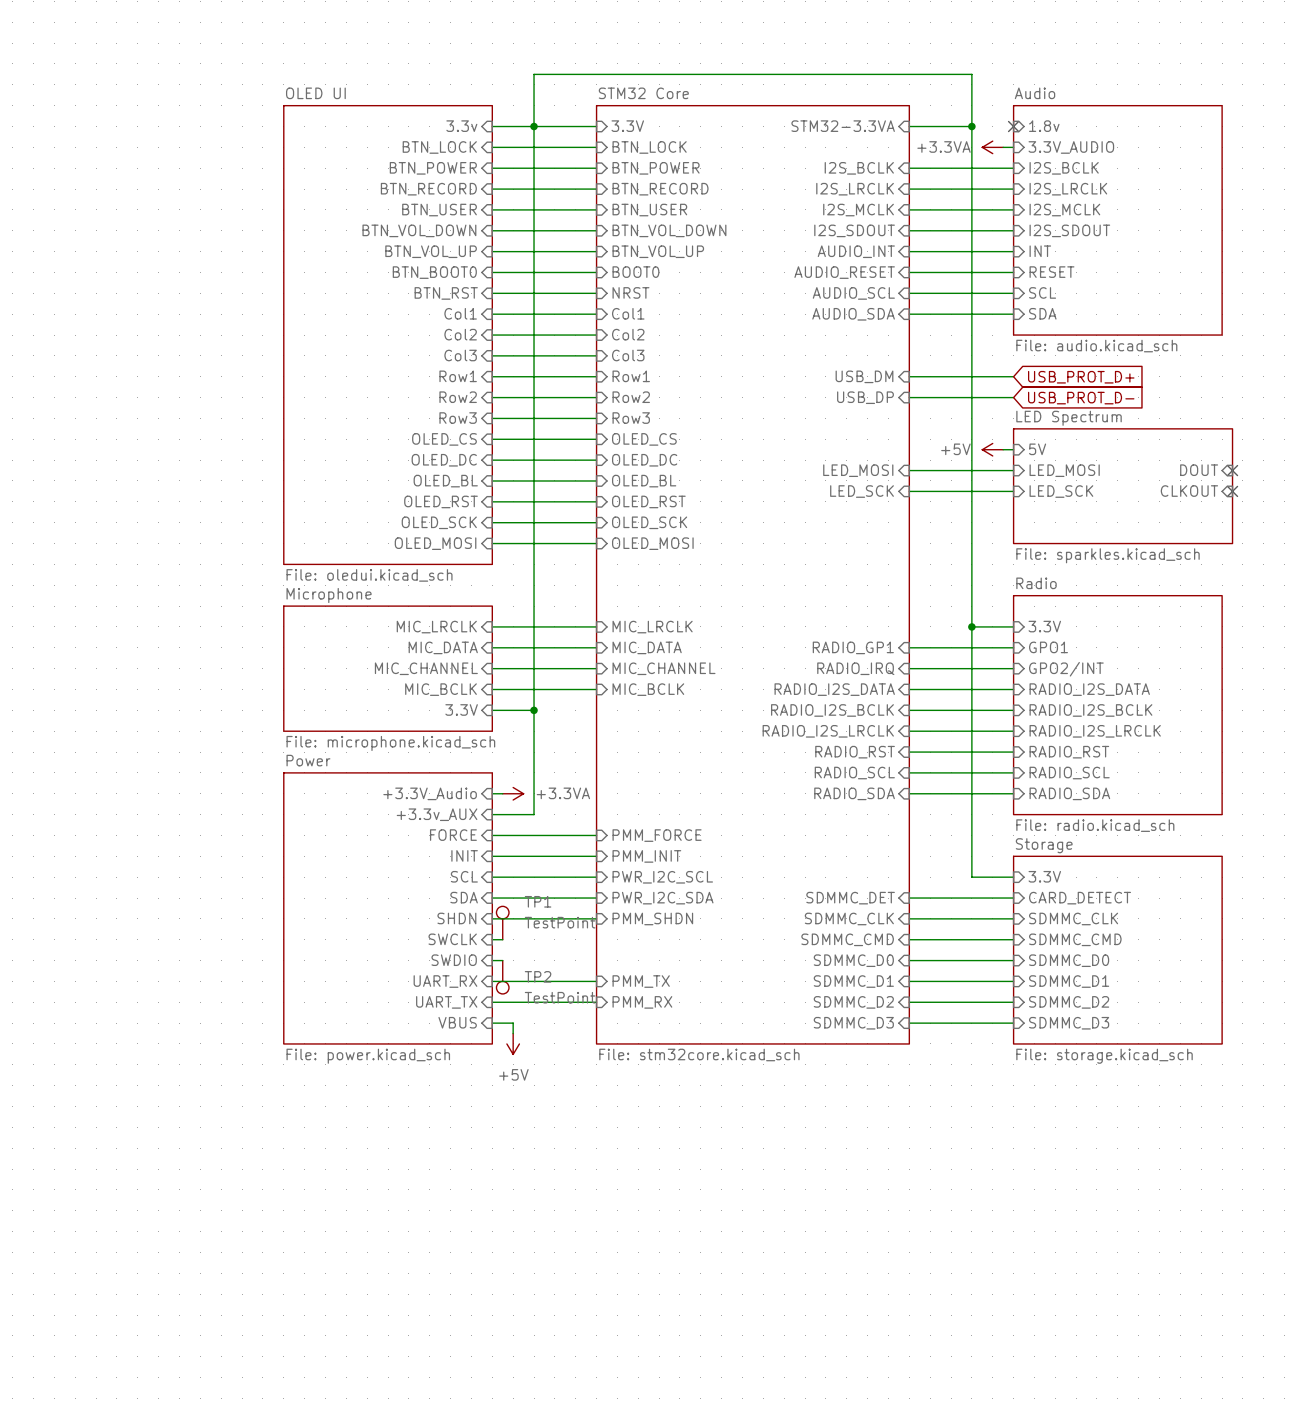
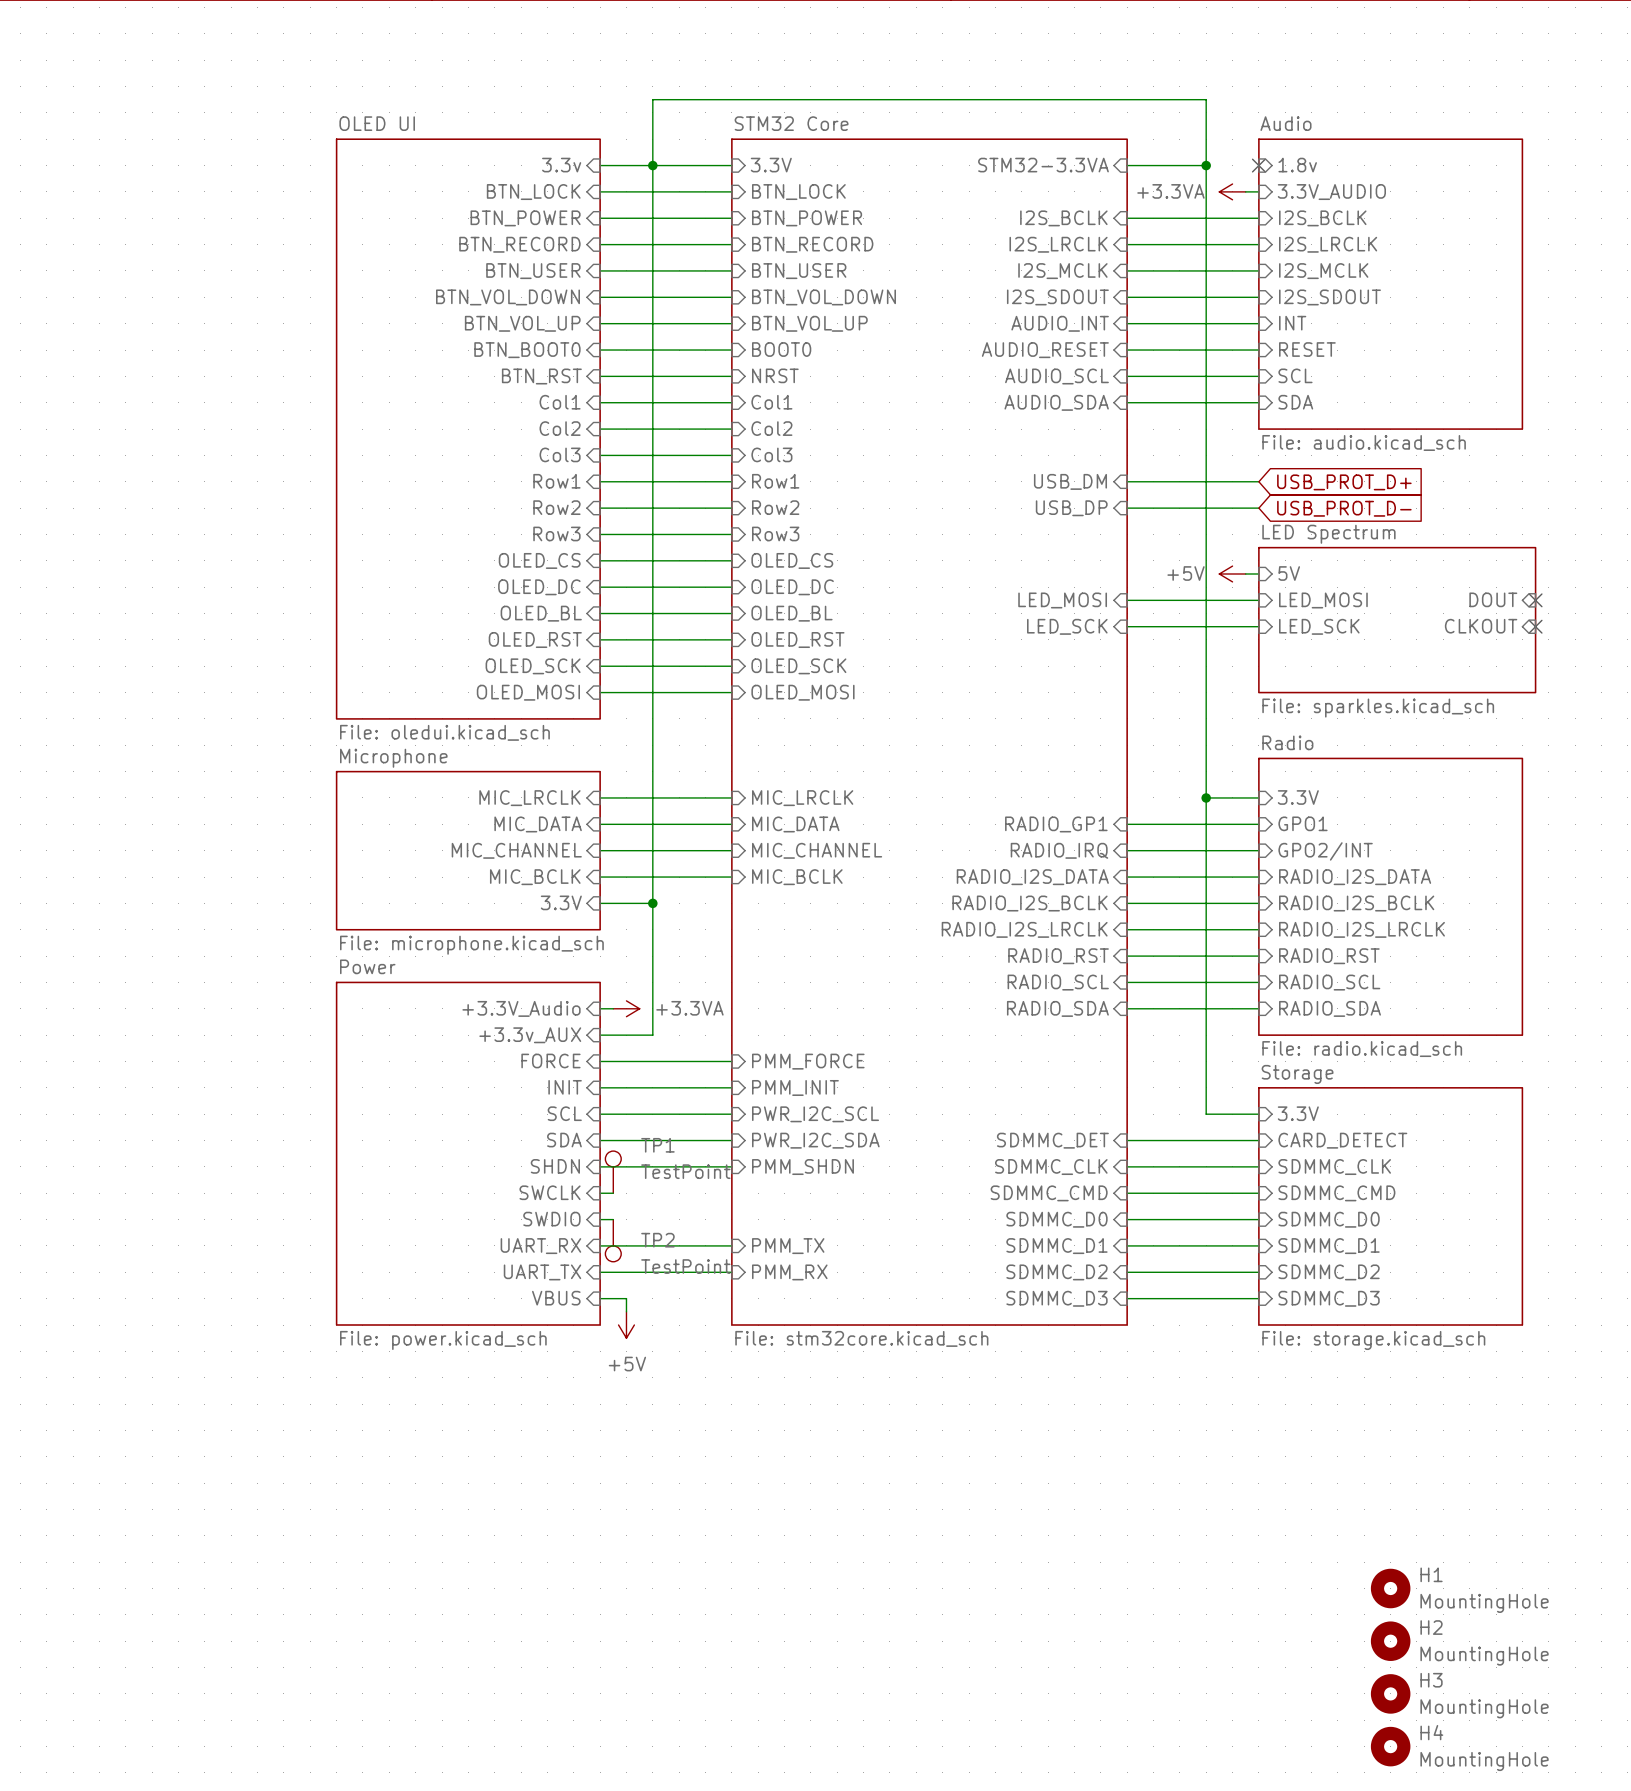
H1: none -> MountingHole (1390, 1588)
H2: none -> MountingHole (1390, 1641)
H3: none -> MountingHole (1390, 1693)
H4: none -> MountingHole (1390, 1746)

